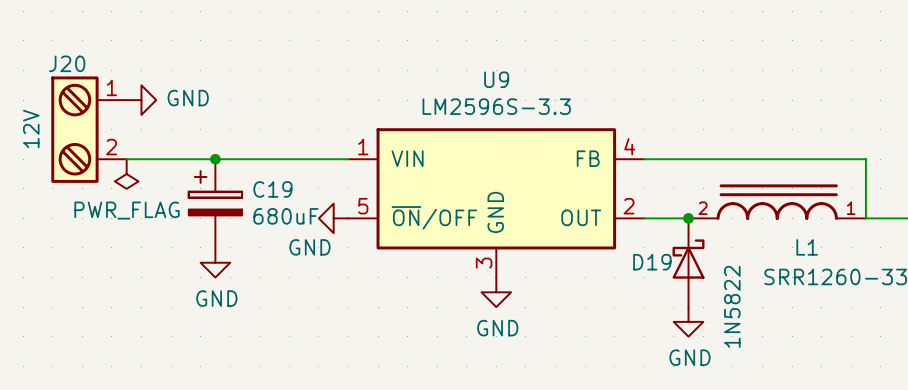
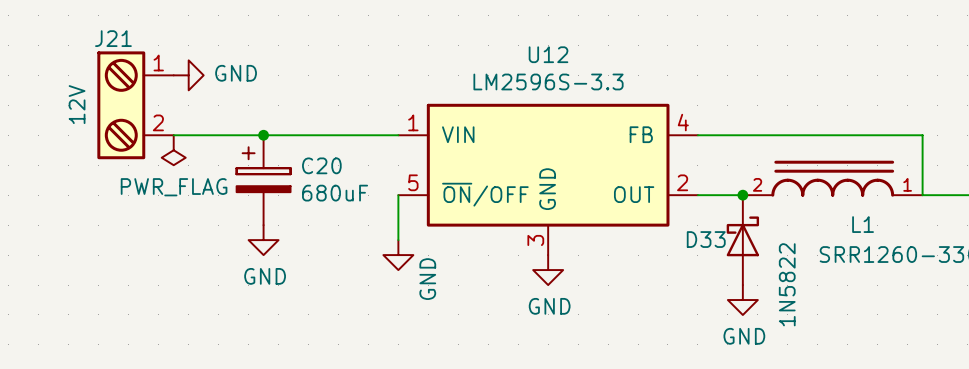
J20 name: J20 (67, 63) -> J21 (113, 38)
U9 name: U9 (496, 79) -> U12 (548, 54)
C19 name: C19 (272, 189) -> C20 (321, 165)
power symbol rotation: 0° (333, 218) -> 90° counterclockwise (398, 255)
power symbol position: GND (333, 218) -> GND (398, 255)
wire: none -> (398, 195) (398, 240)
D19 name: D19 (652, 262) -> D33 (706, 239)

